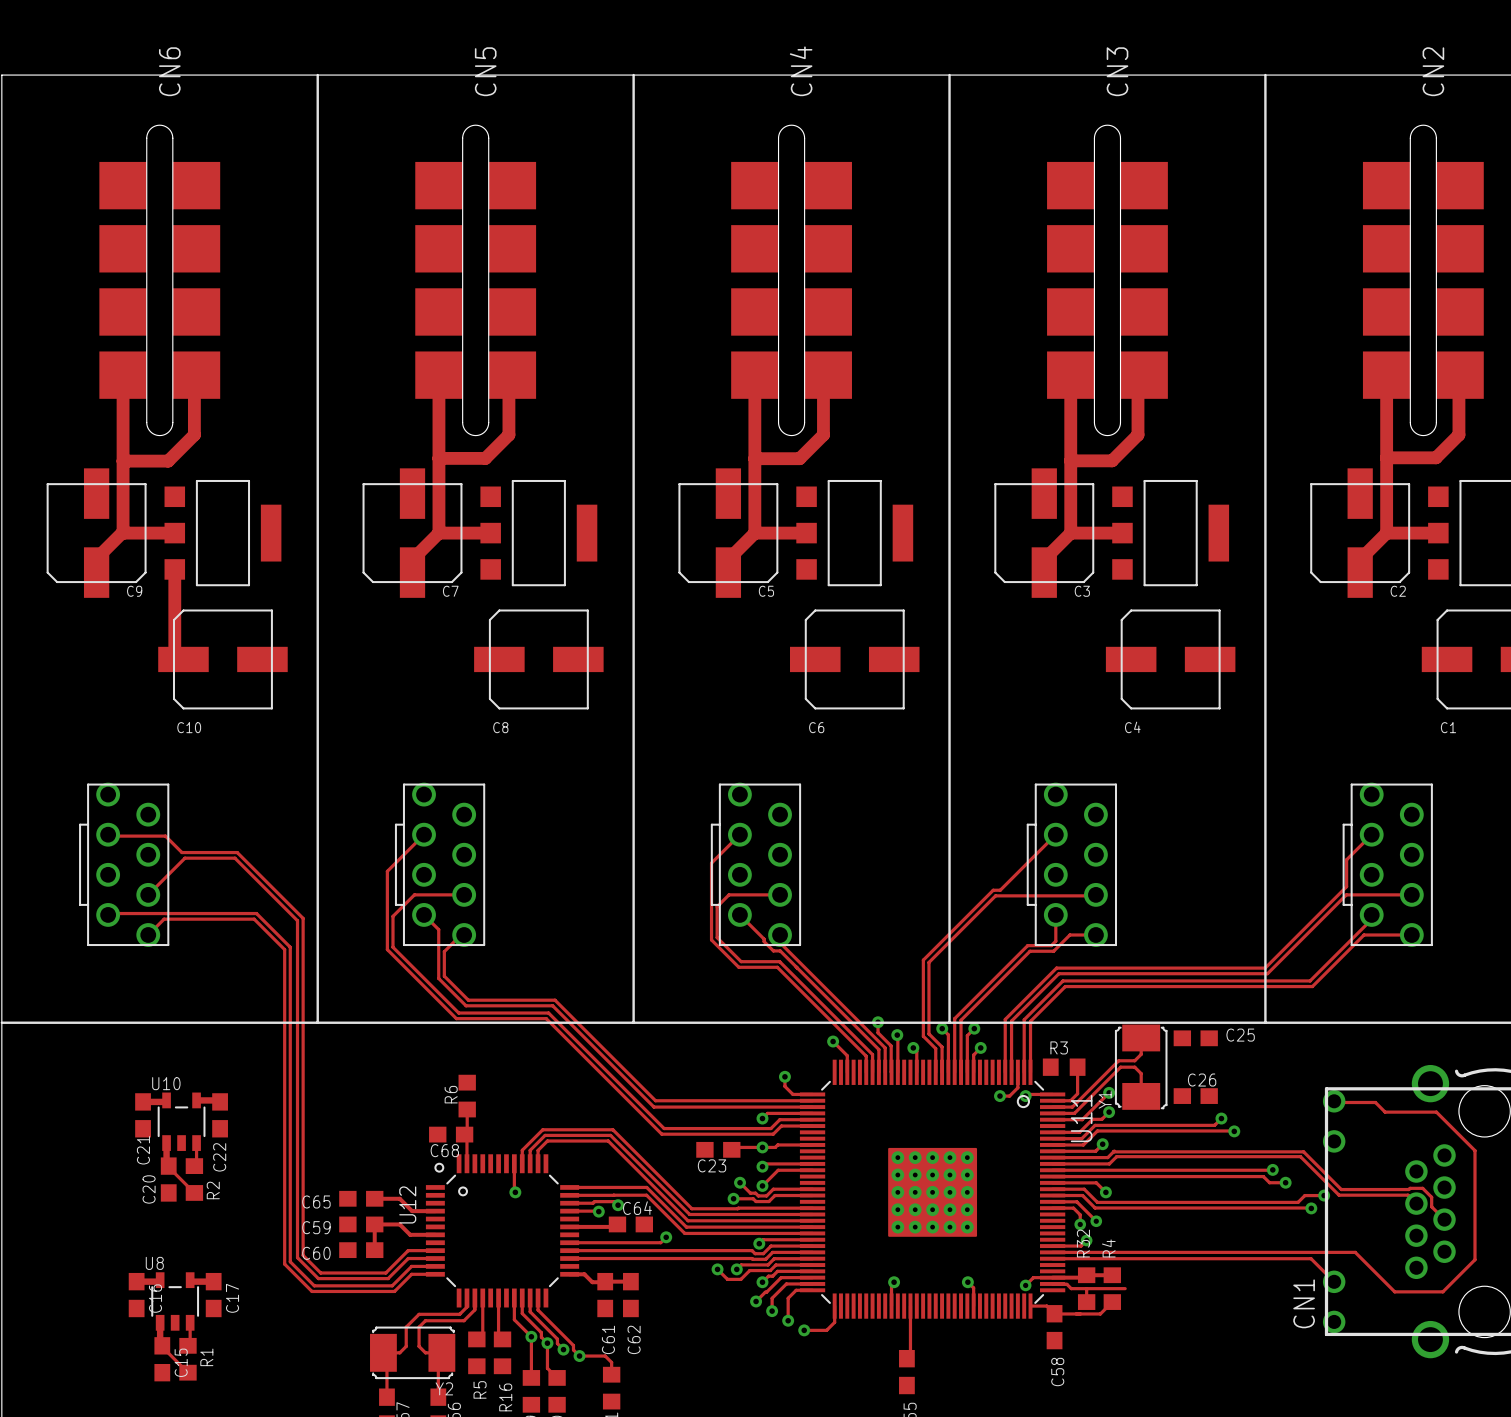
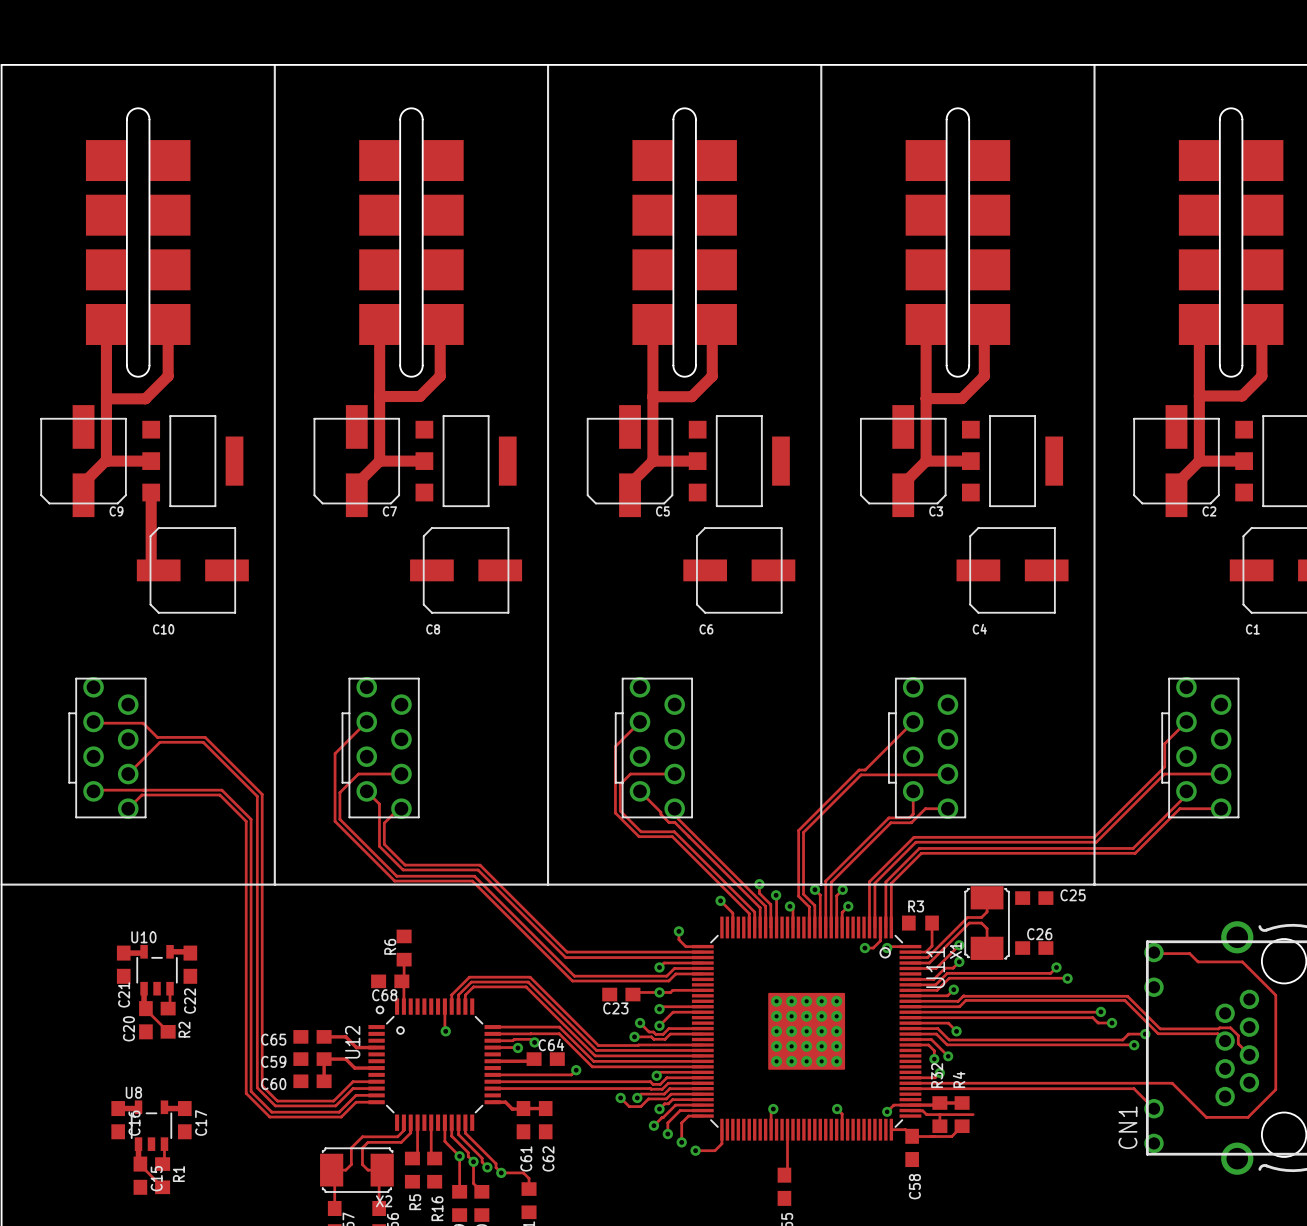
CN6 name: CN6 (169, 71) -> none
CN5 name: CN5 (485, 71) -> none
CN4 name: CN4 (801, 71) -> none
CN3 name: CN3 (1117, 71) -> none
CN2 name: CN2 (1433, 71) -> none
Y1 name: Y1 (1105, 1099) -> X1 (955, 950)
Y2 name: Y2 (444, 1388) -> X2 (384, 1201)

